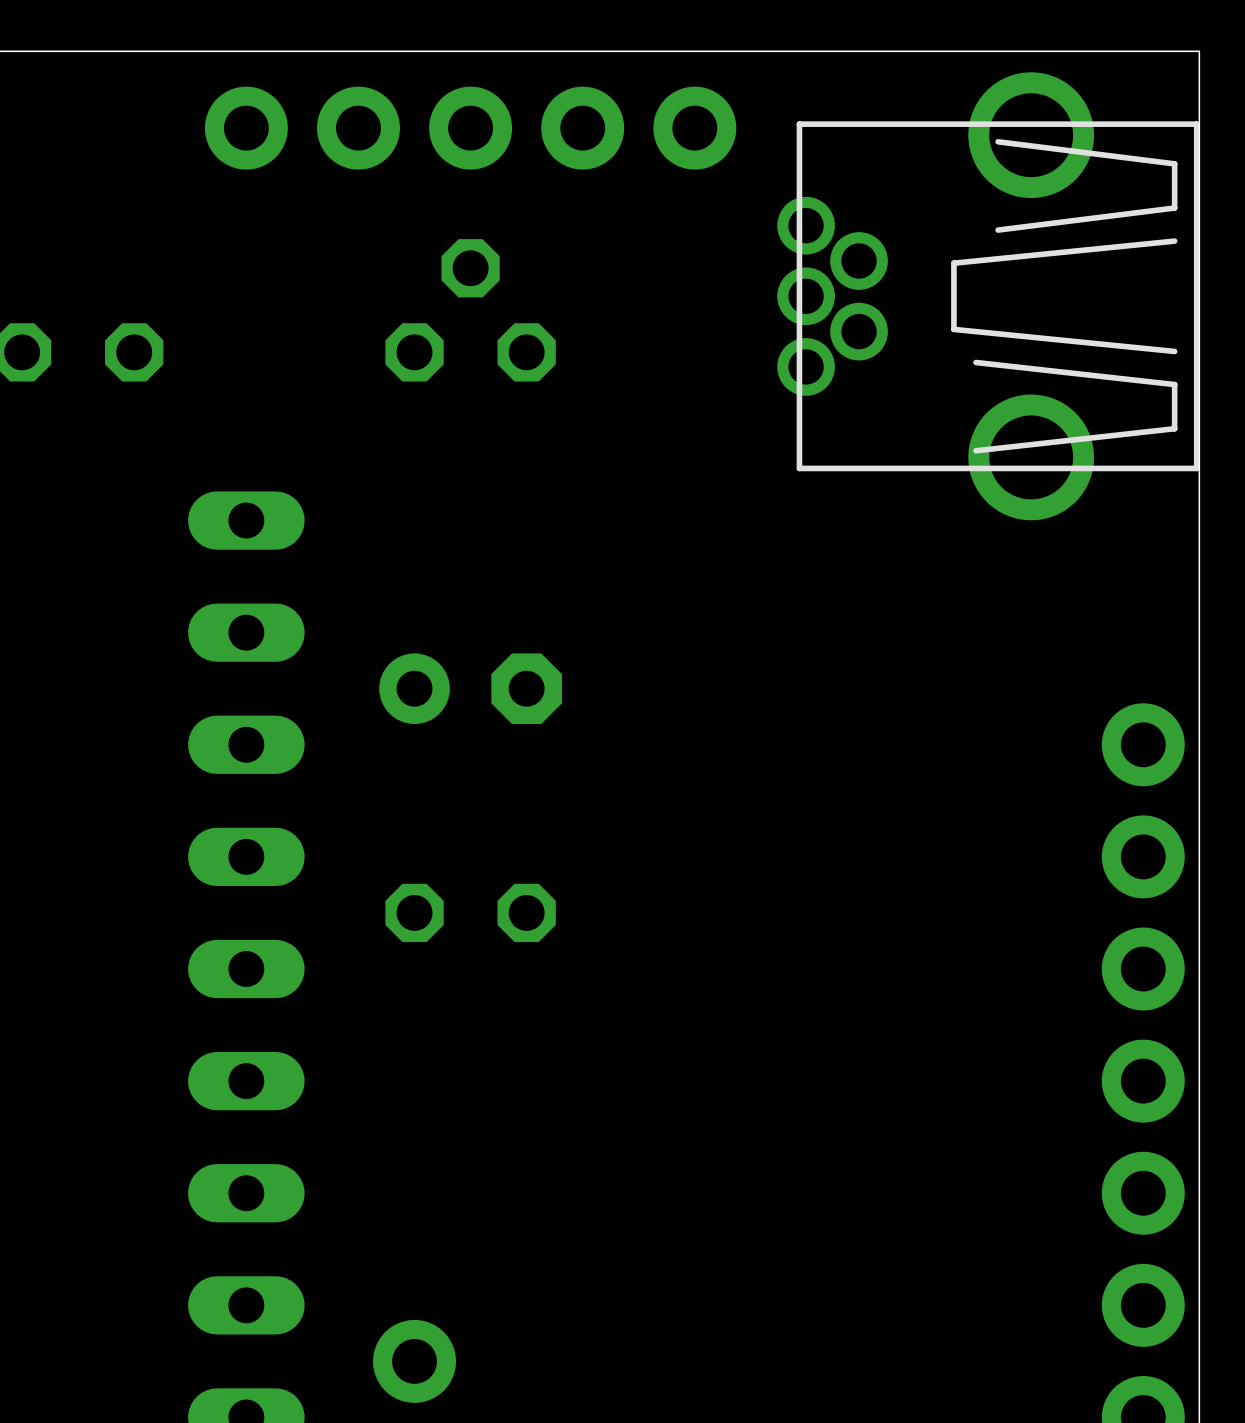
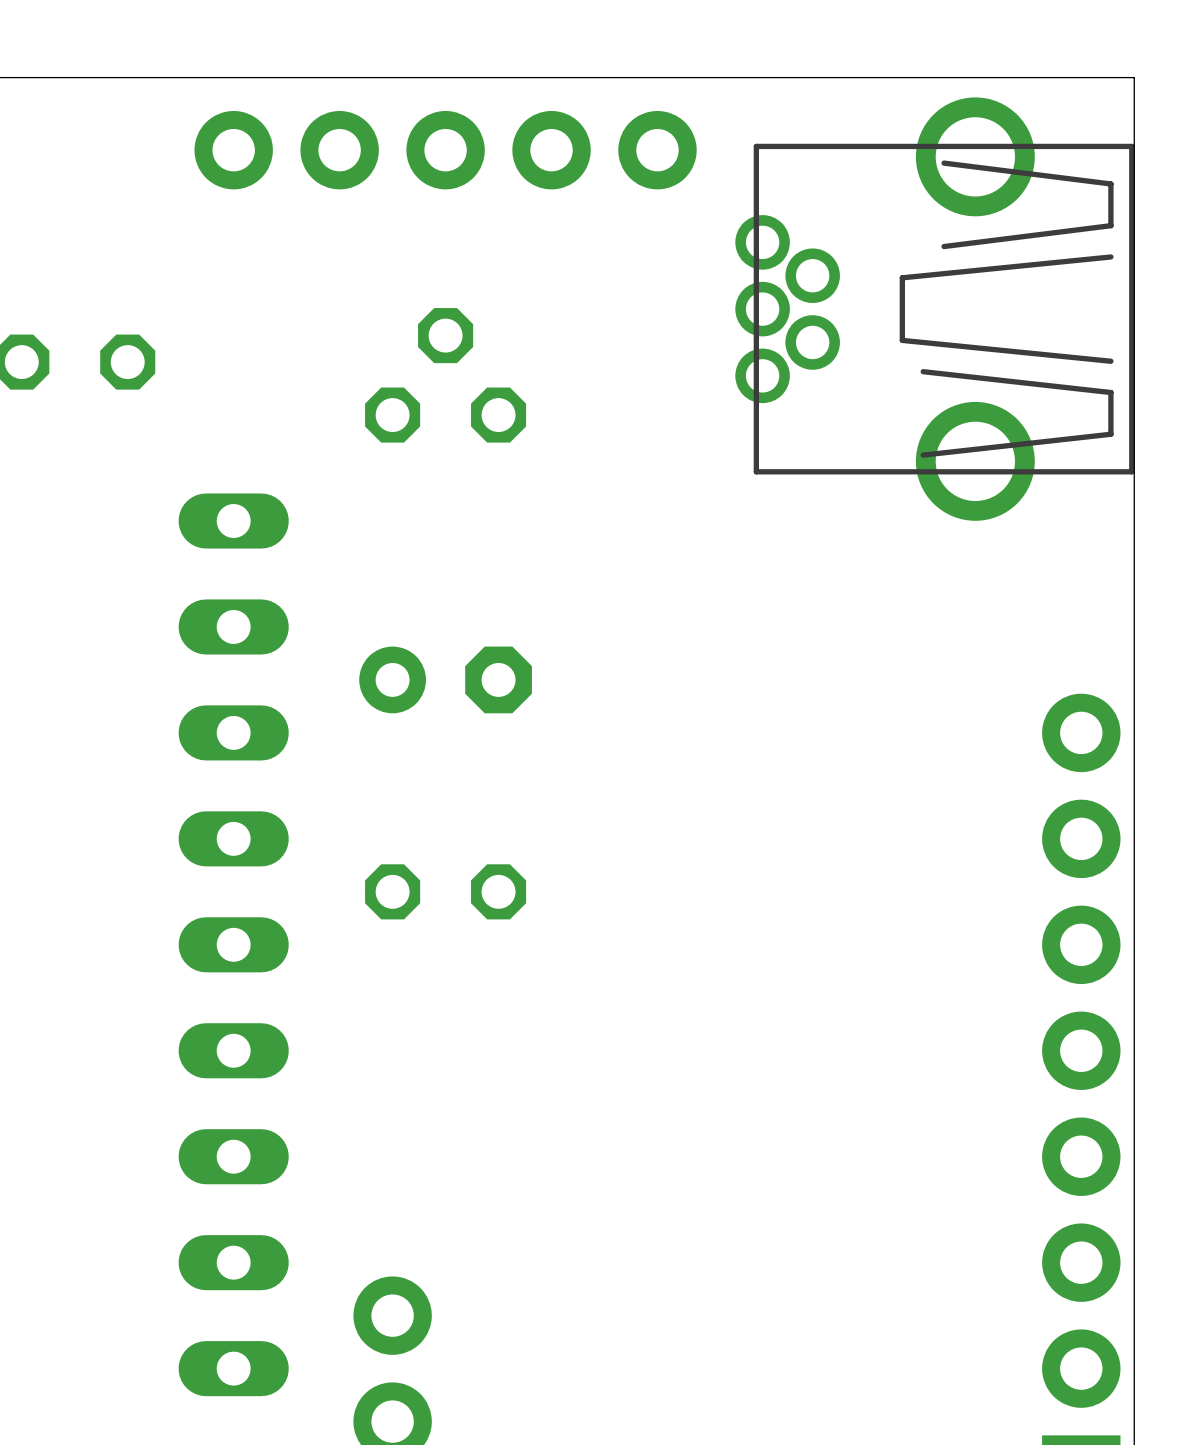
part position: (470, 310) -> (445, 375)

